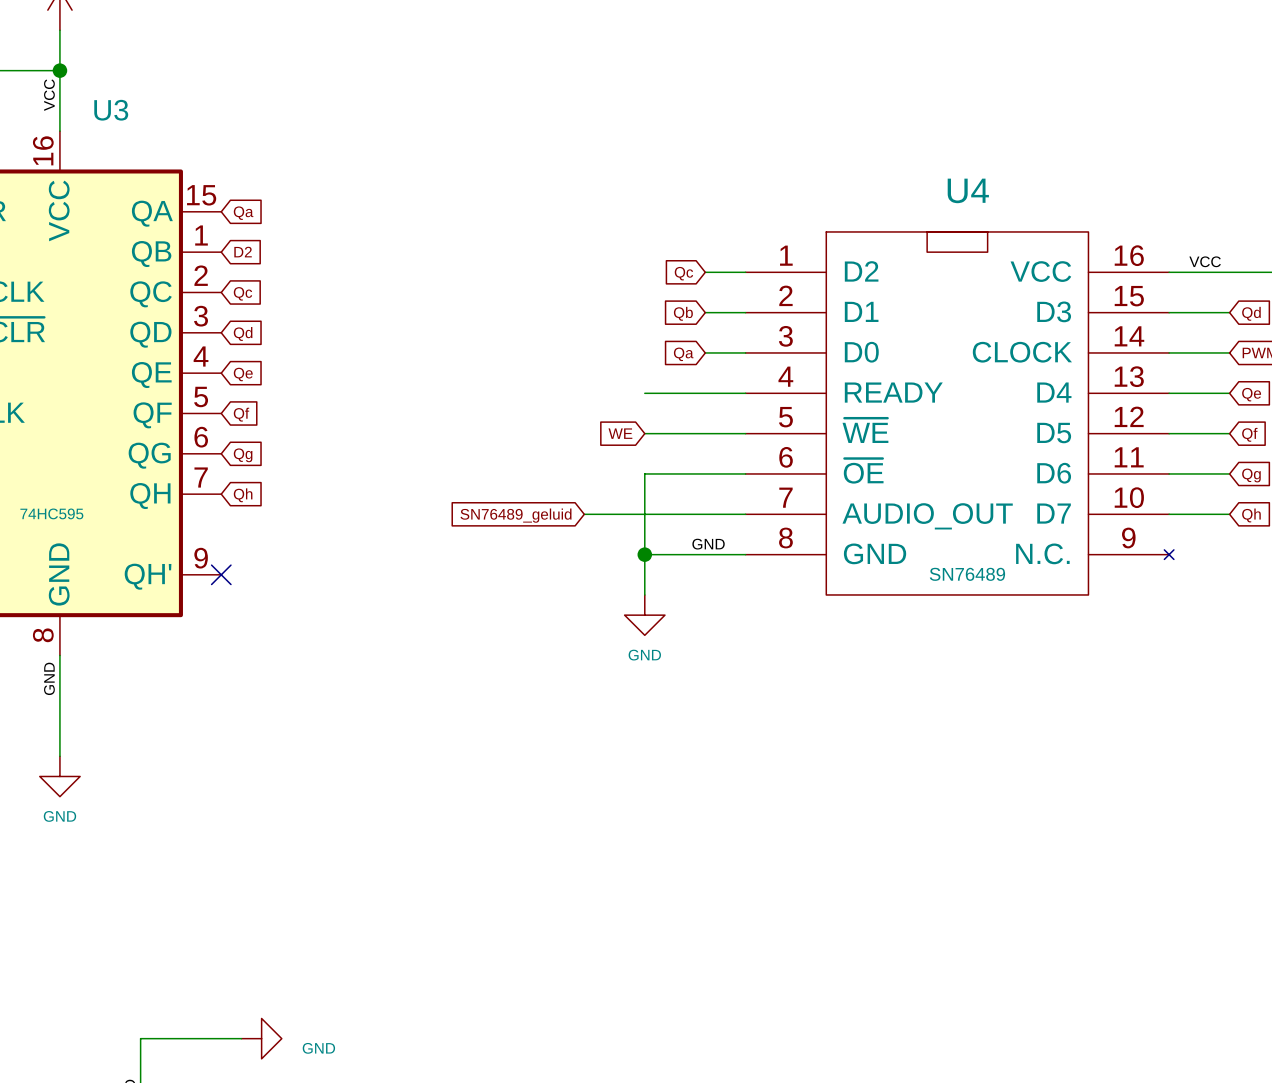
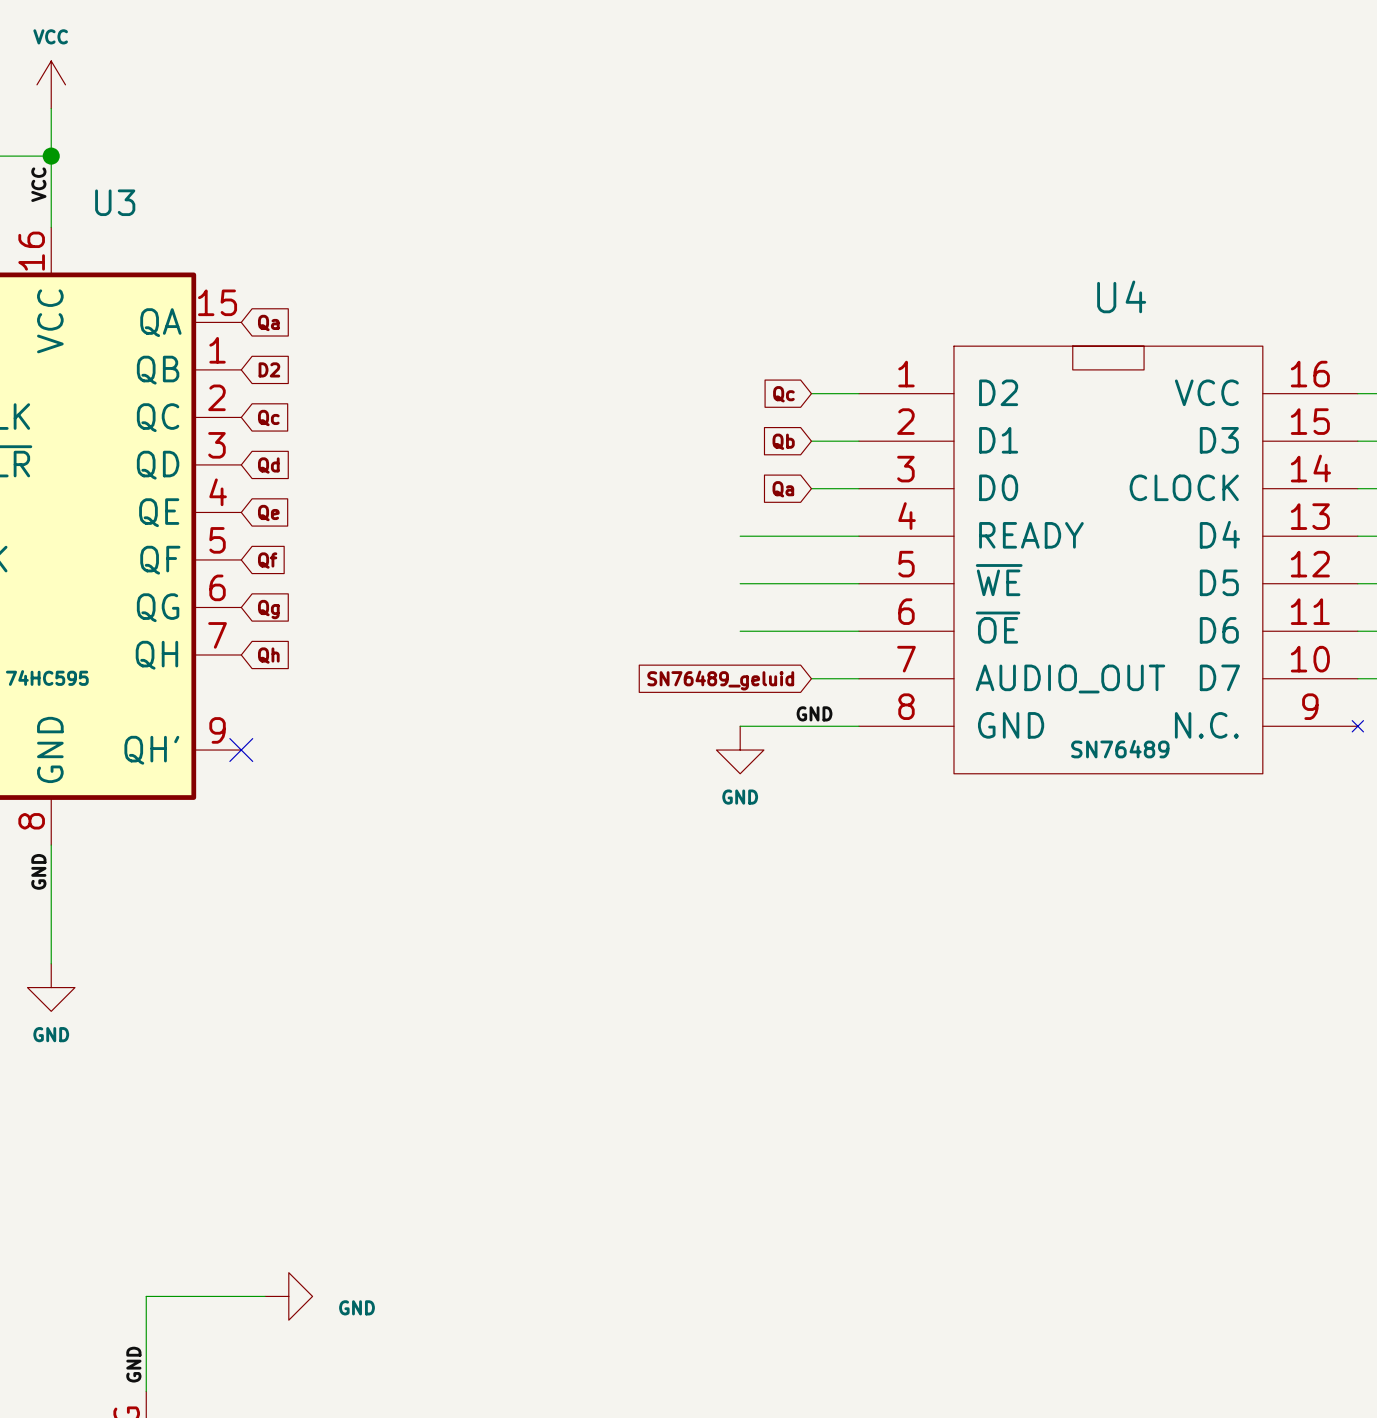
global label: WE (620, 433) -> none
wire: (644, 473) (644, 594) -> none
wire: (584, 514) (705, 514) -> none
global label position: SN76489_geluid (516, 515) -> SN76489_geluid (720, 680)
junction: (644, 554) -> none
power symbol position: GND (644, 615) -> GND (740, 750)

